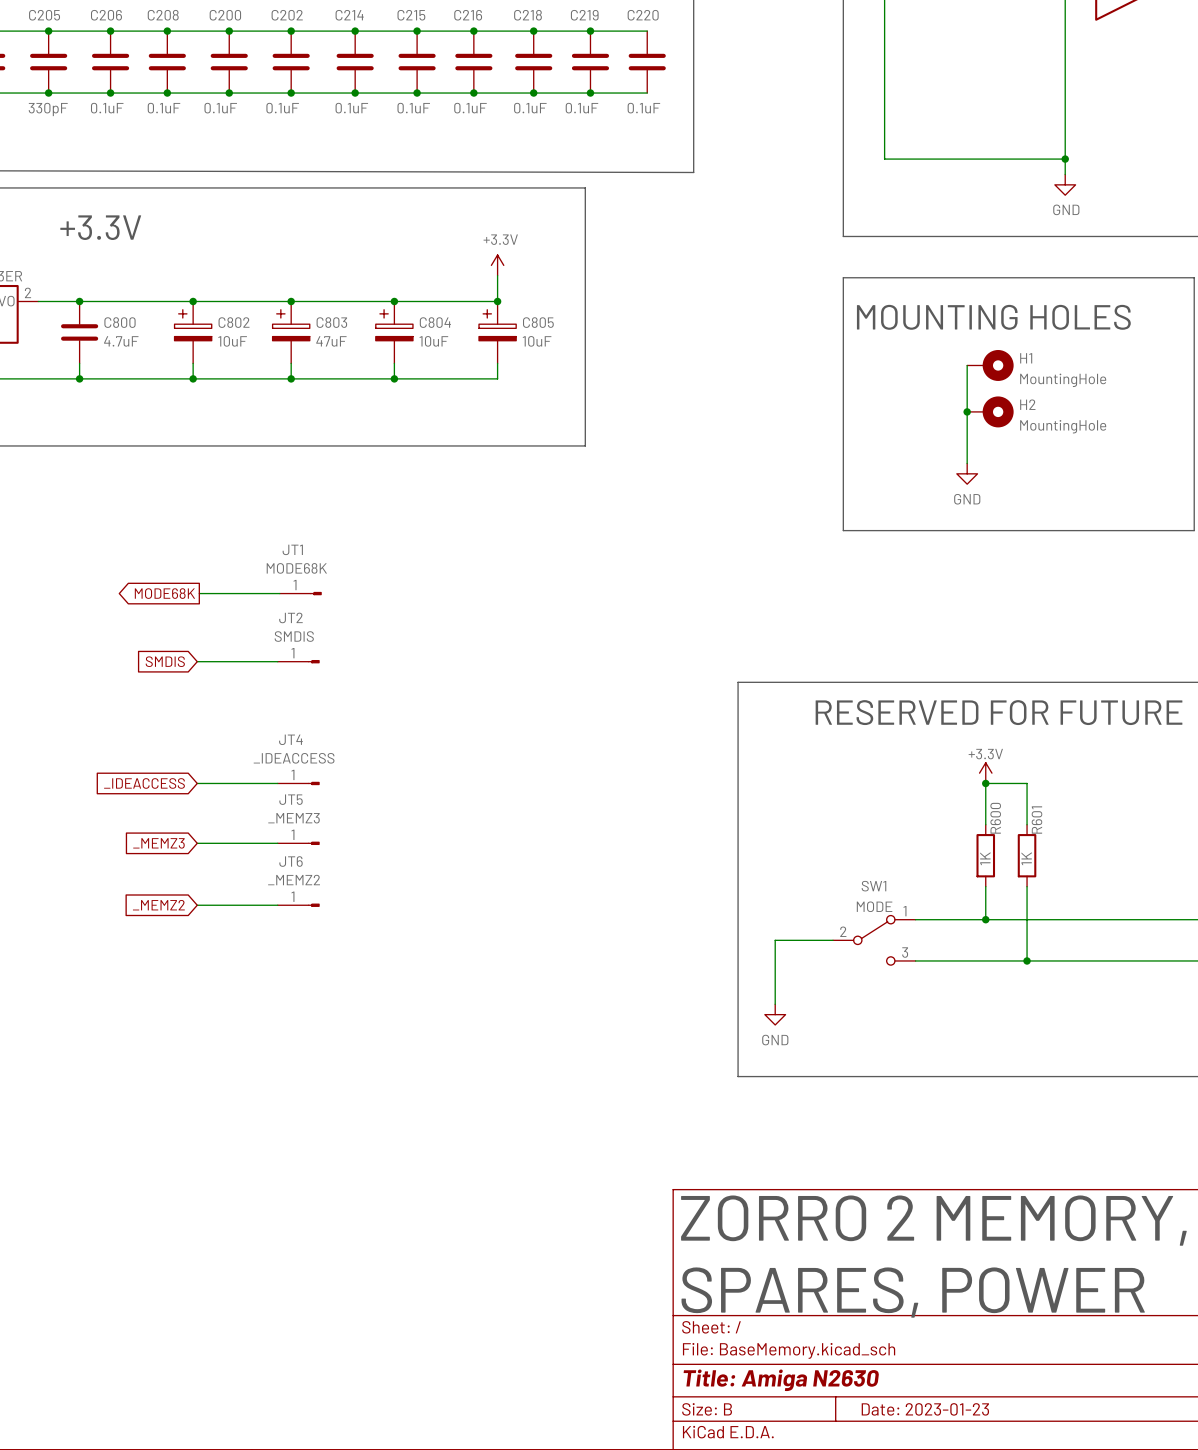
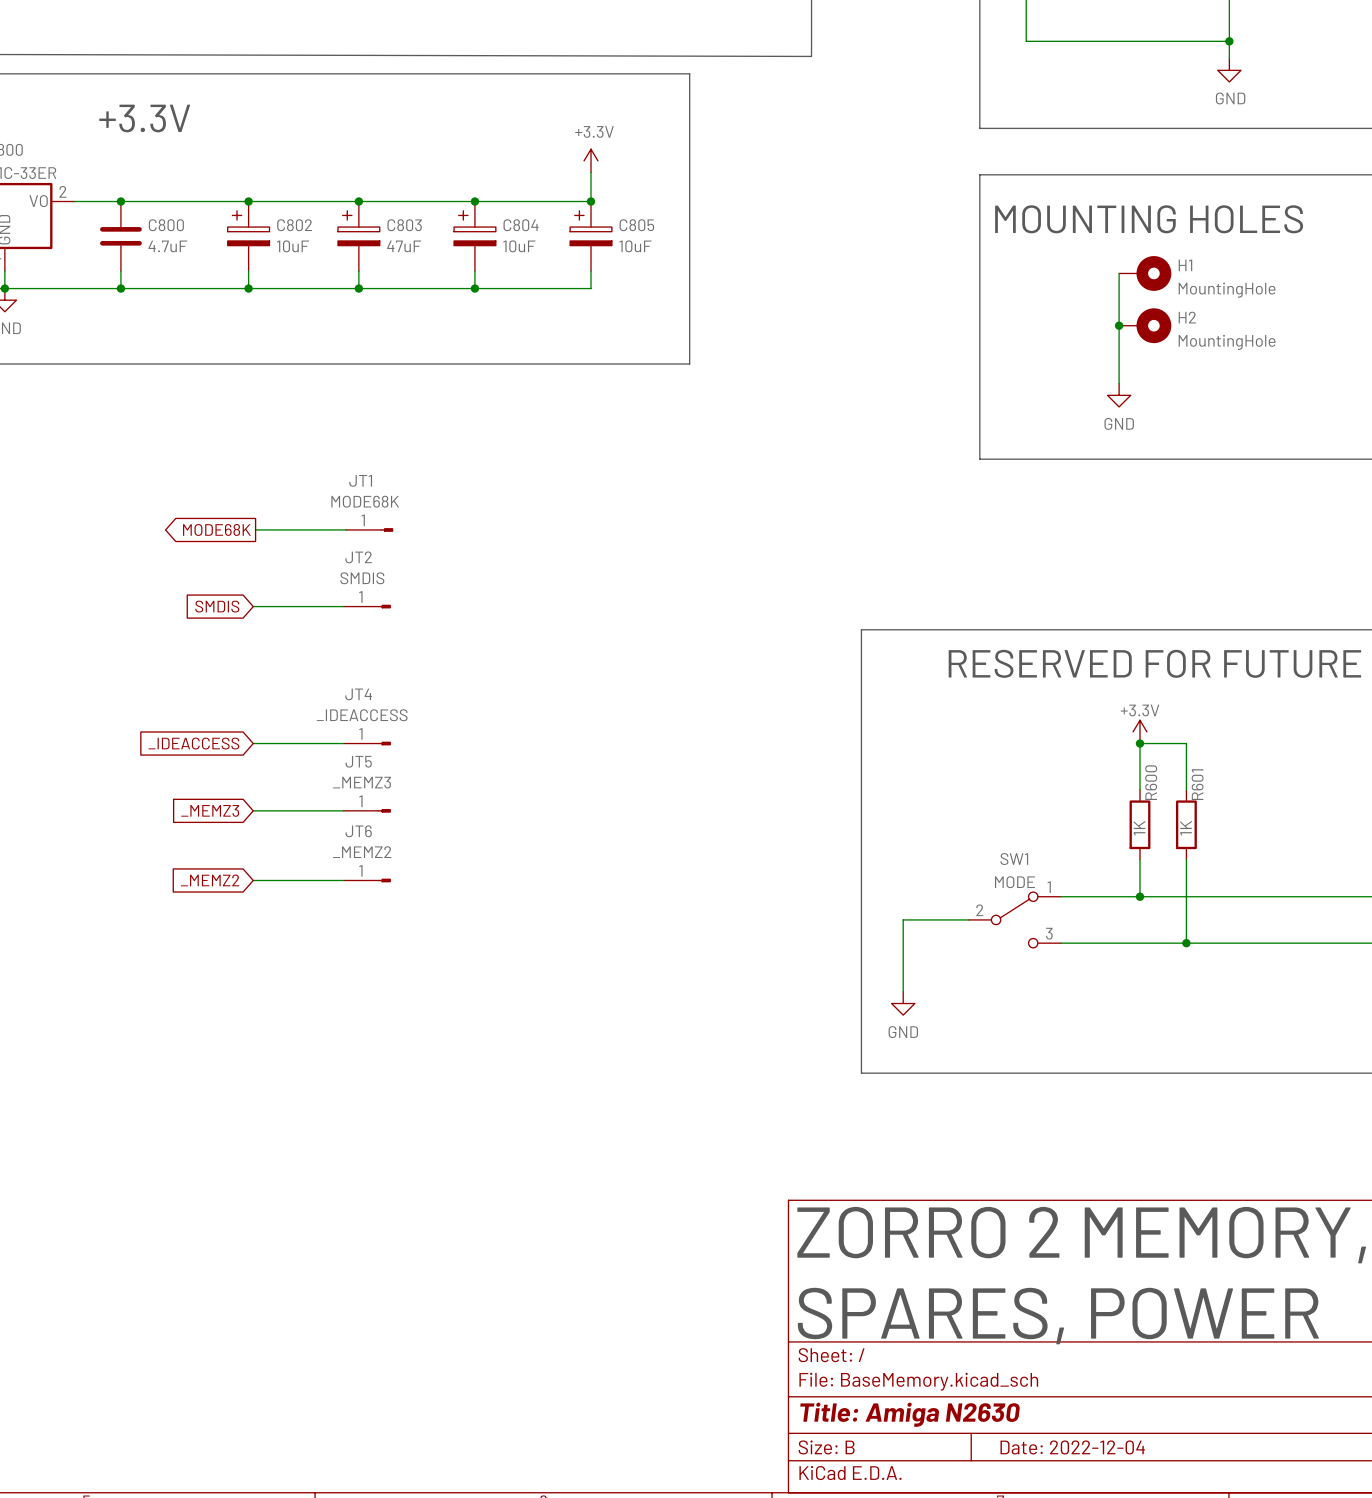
title block: Date: 2023-01-23 (925, 1409) -> Date: 2022-12-04 (1072, 1447)

